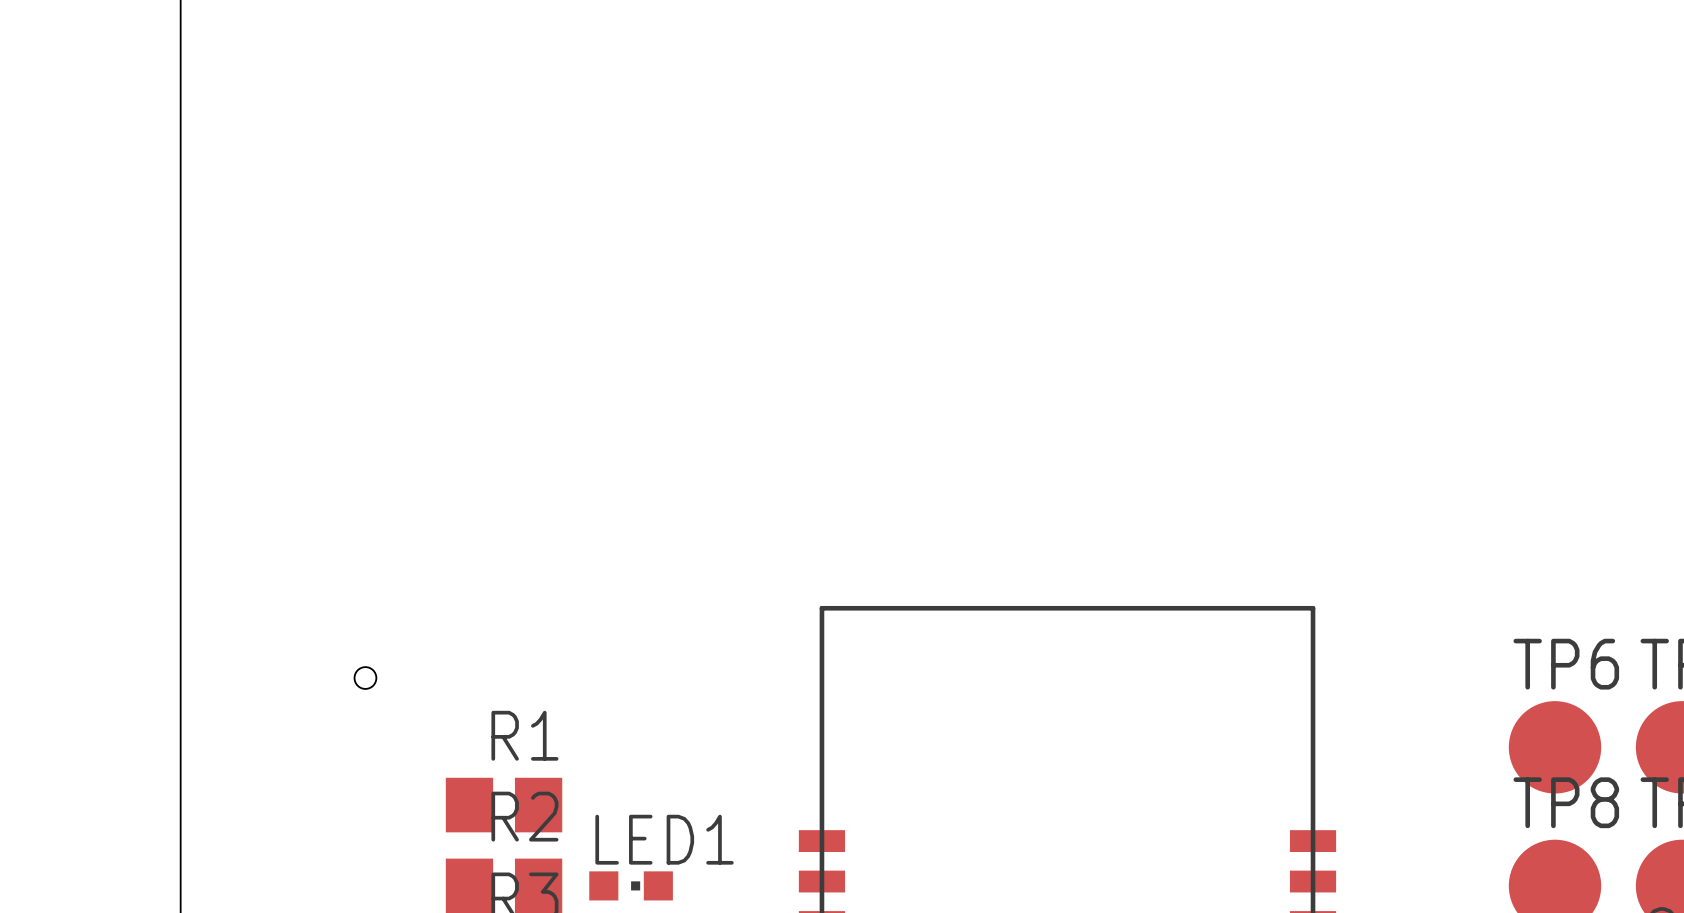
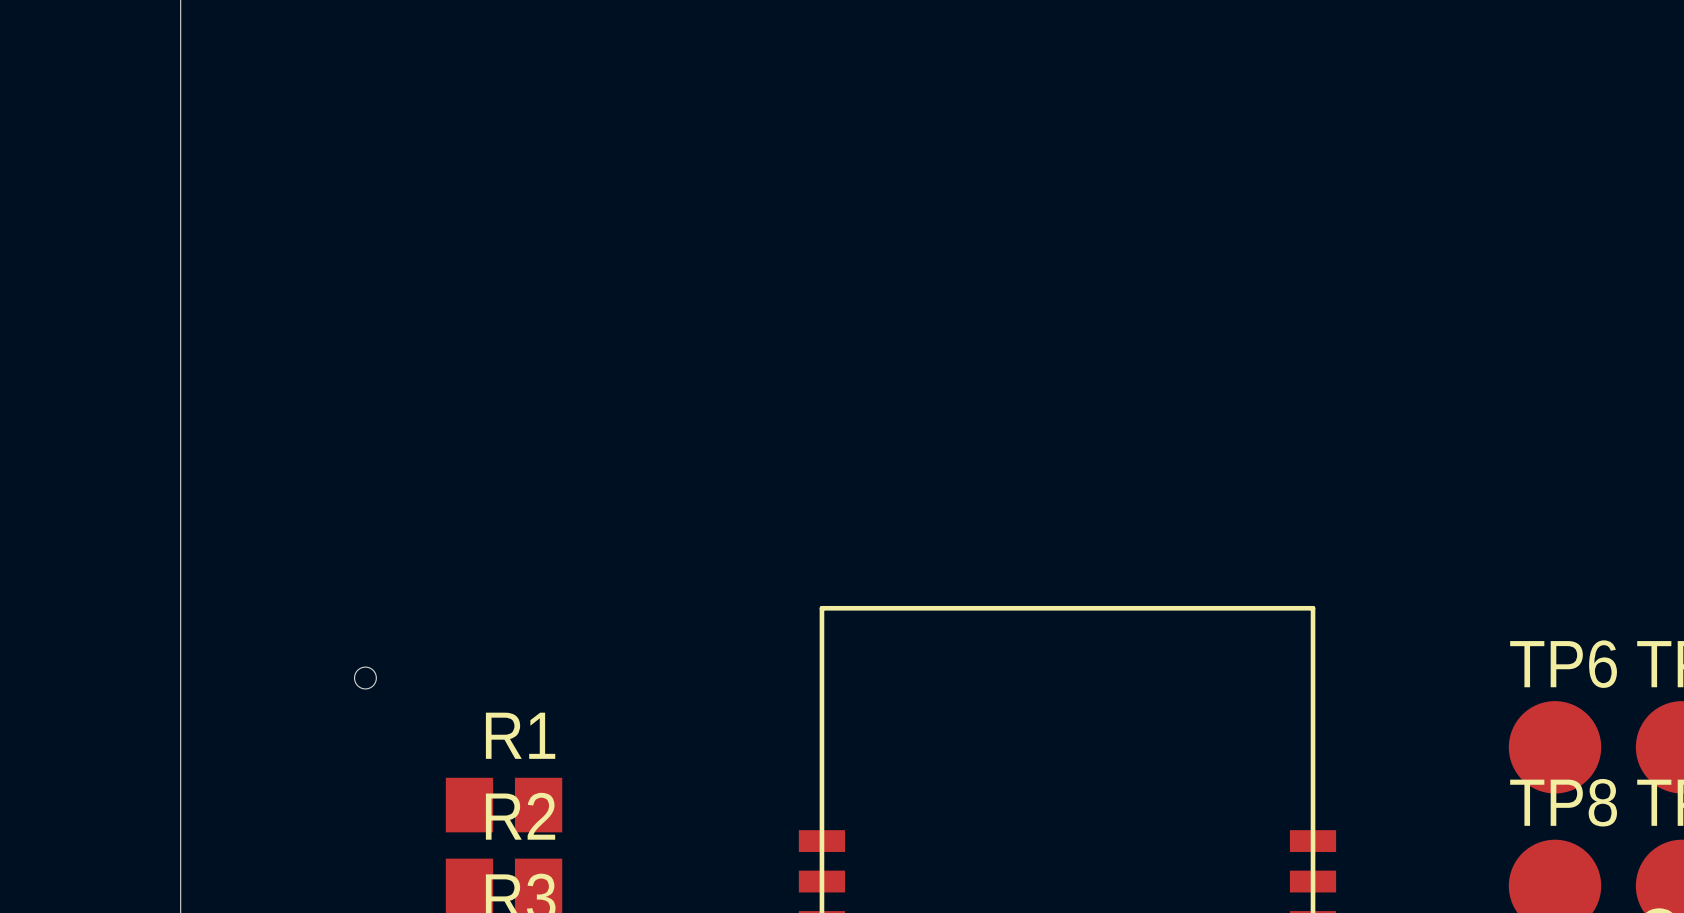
LED1: (631, 885) -> none

